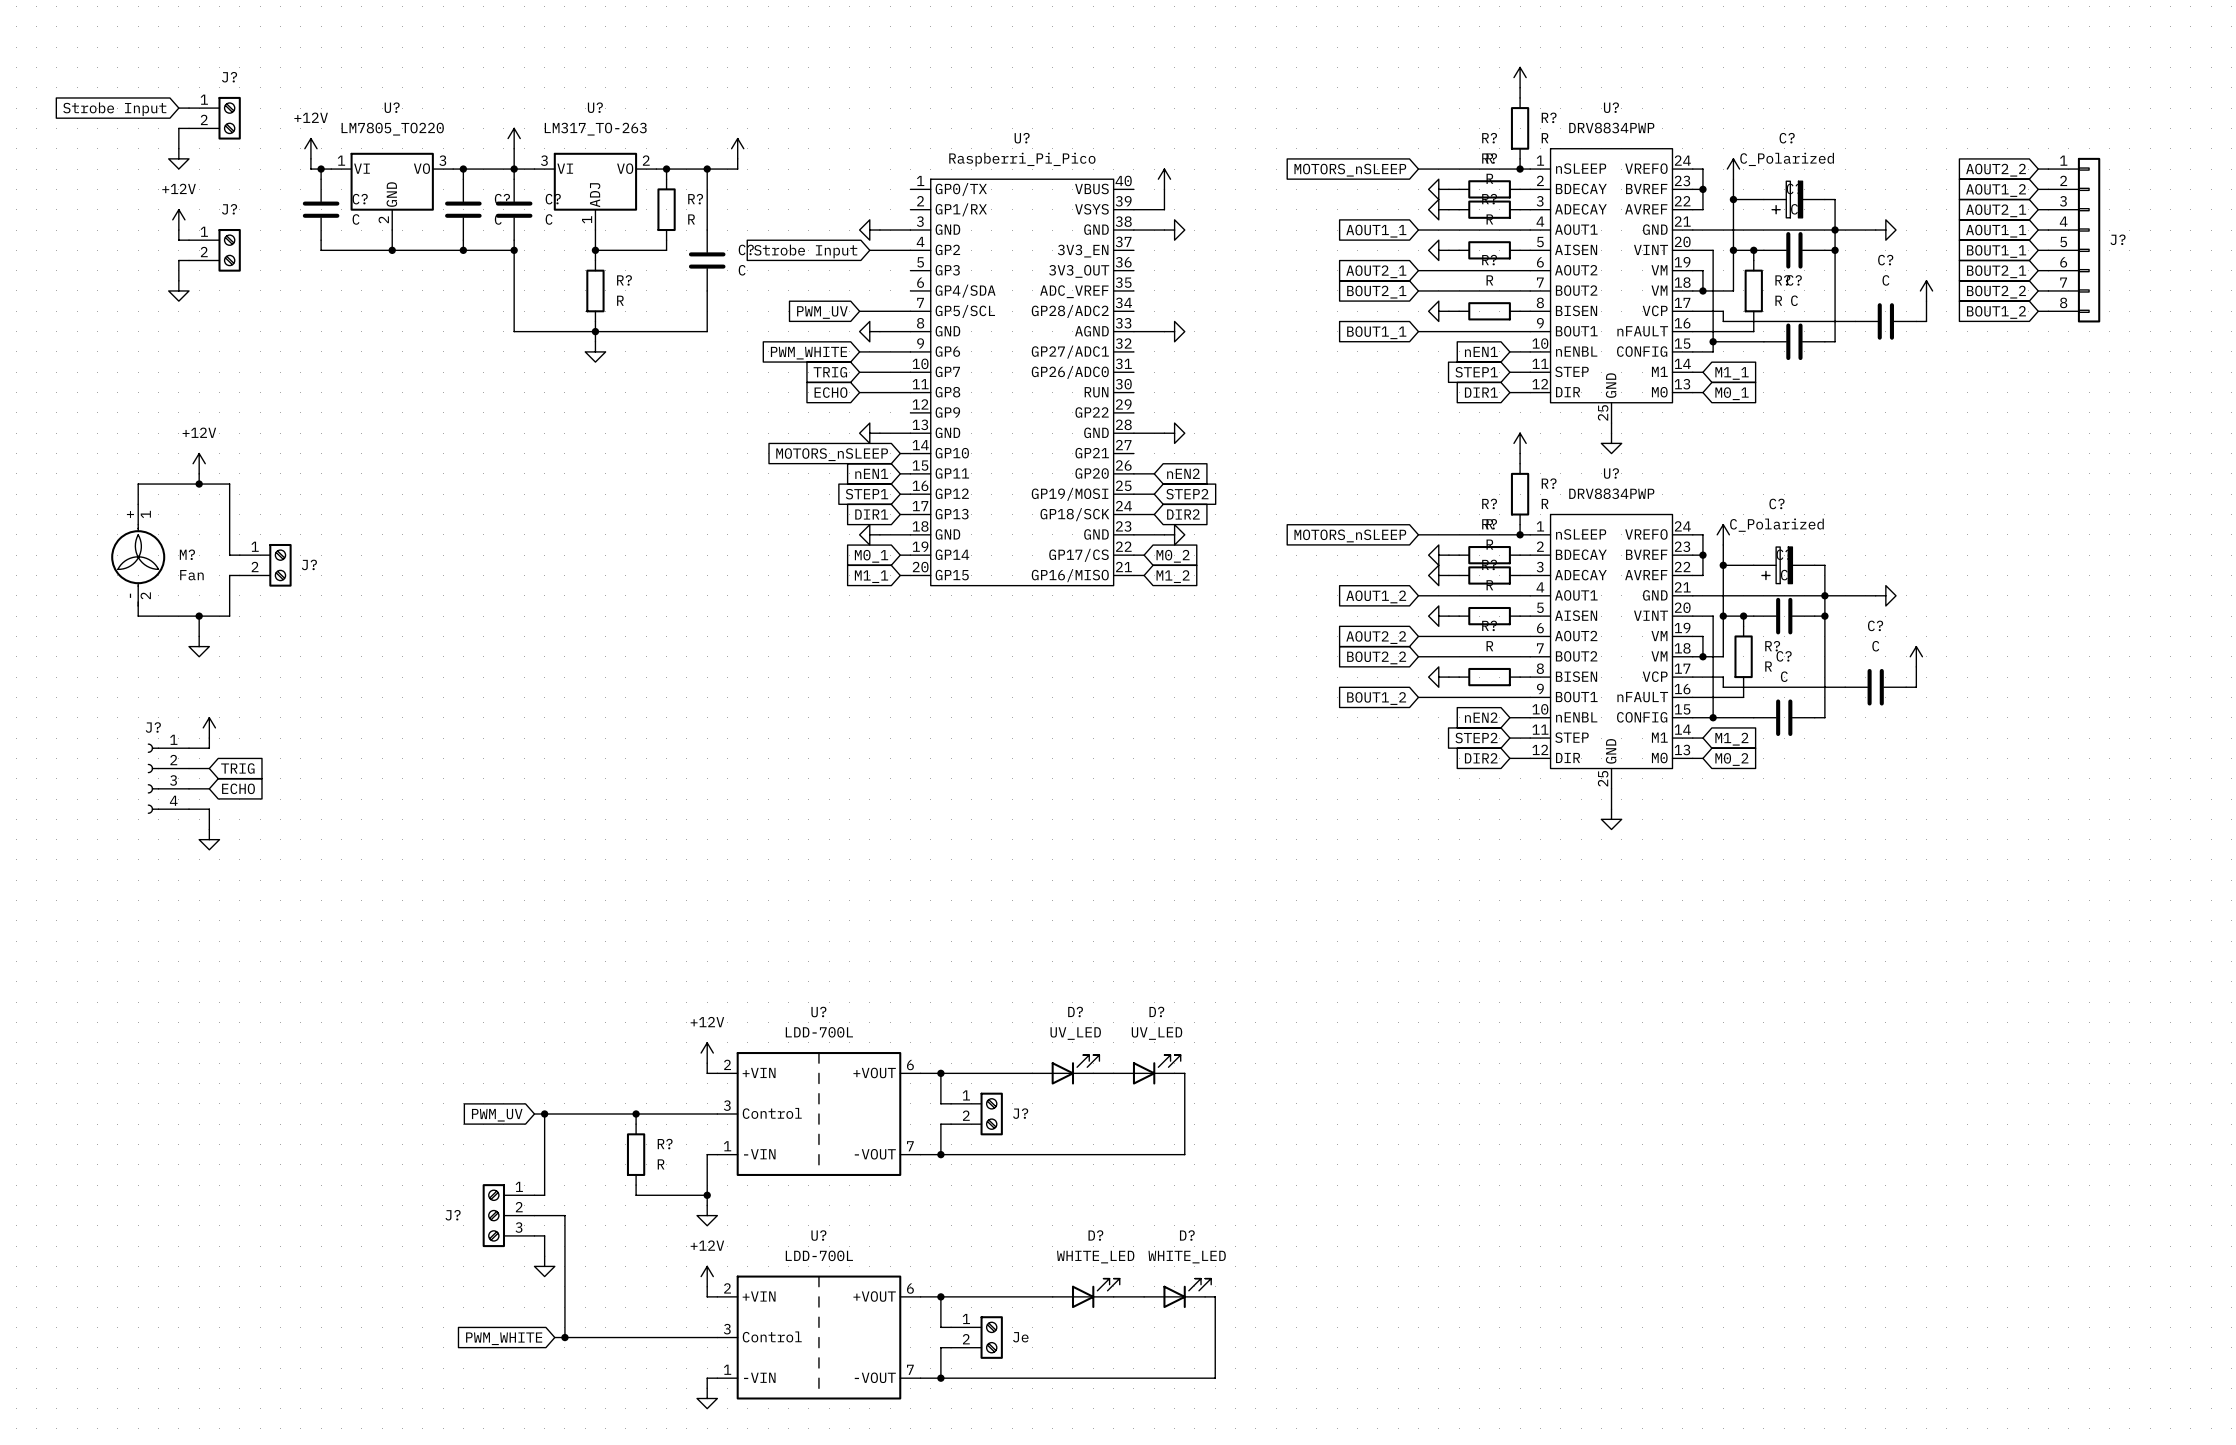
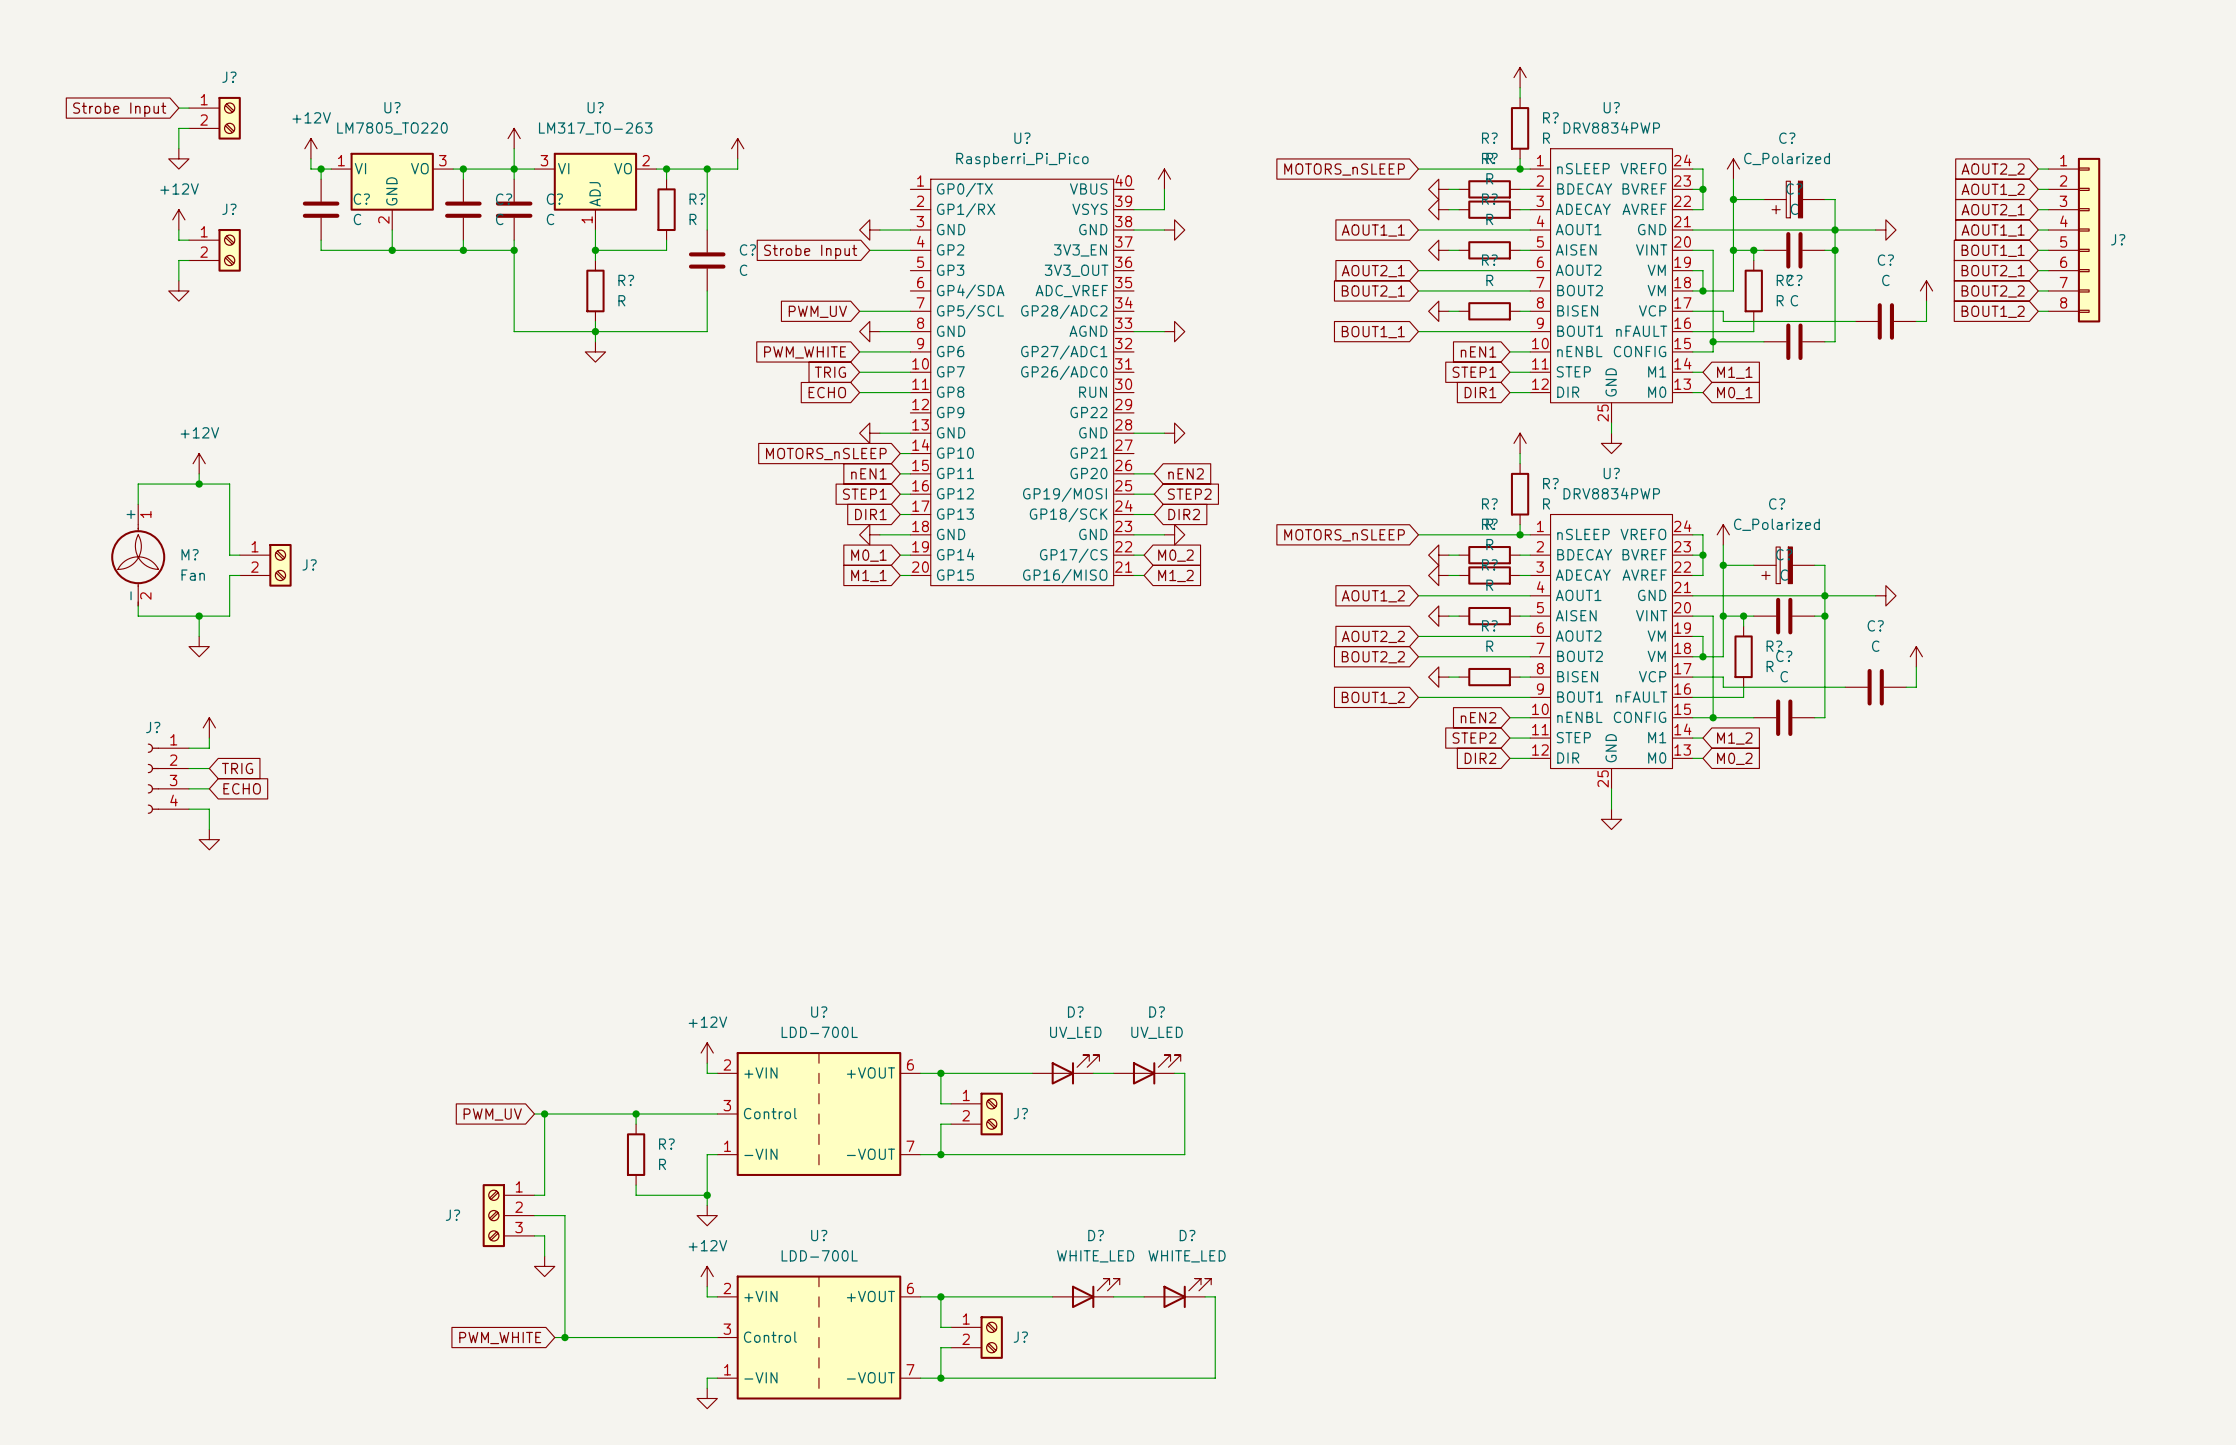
Je name: Je (1020, 1337) -> J? (1020, 1337)

